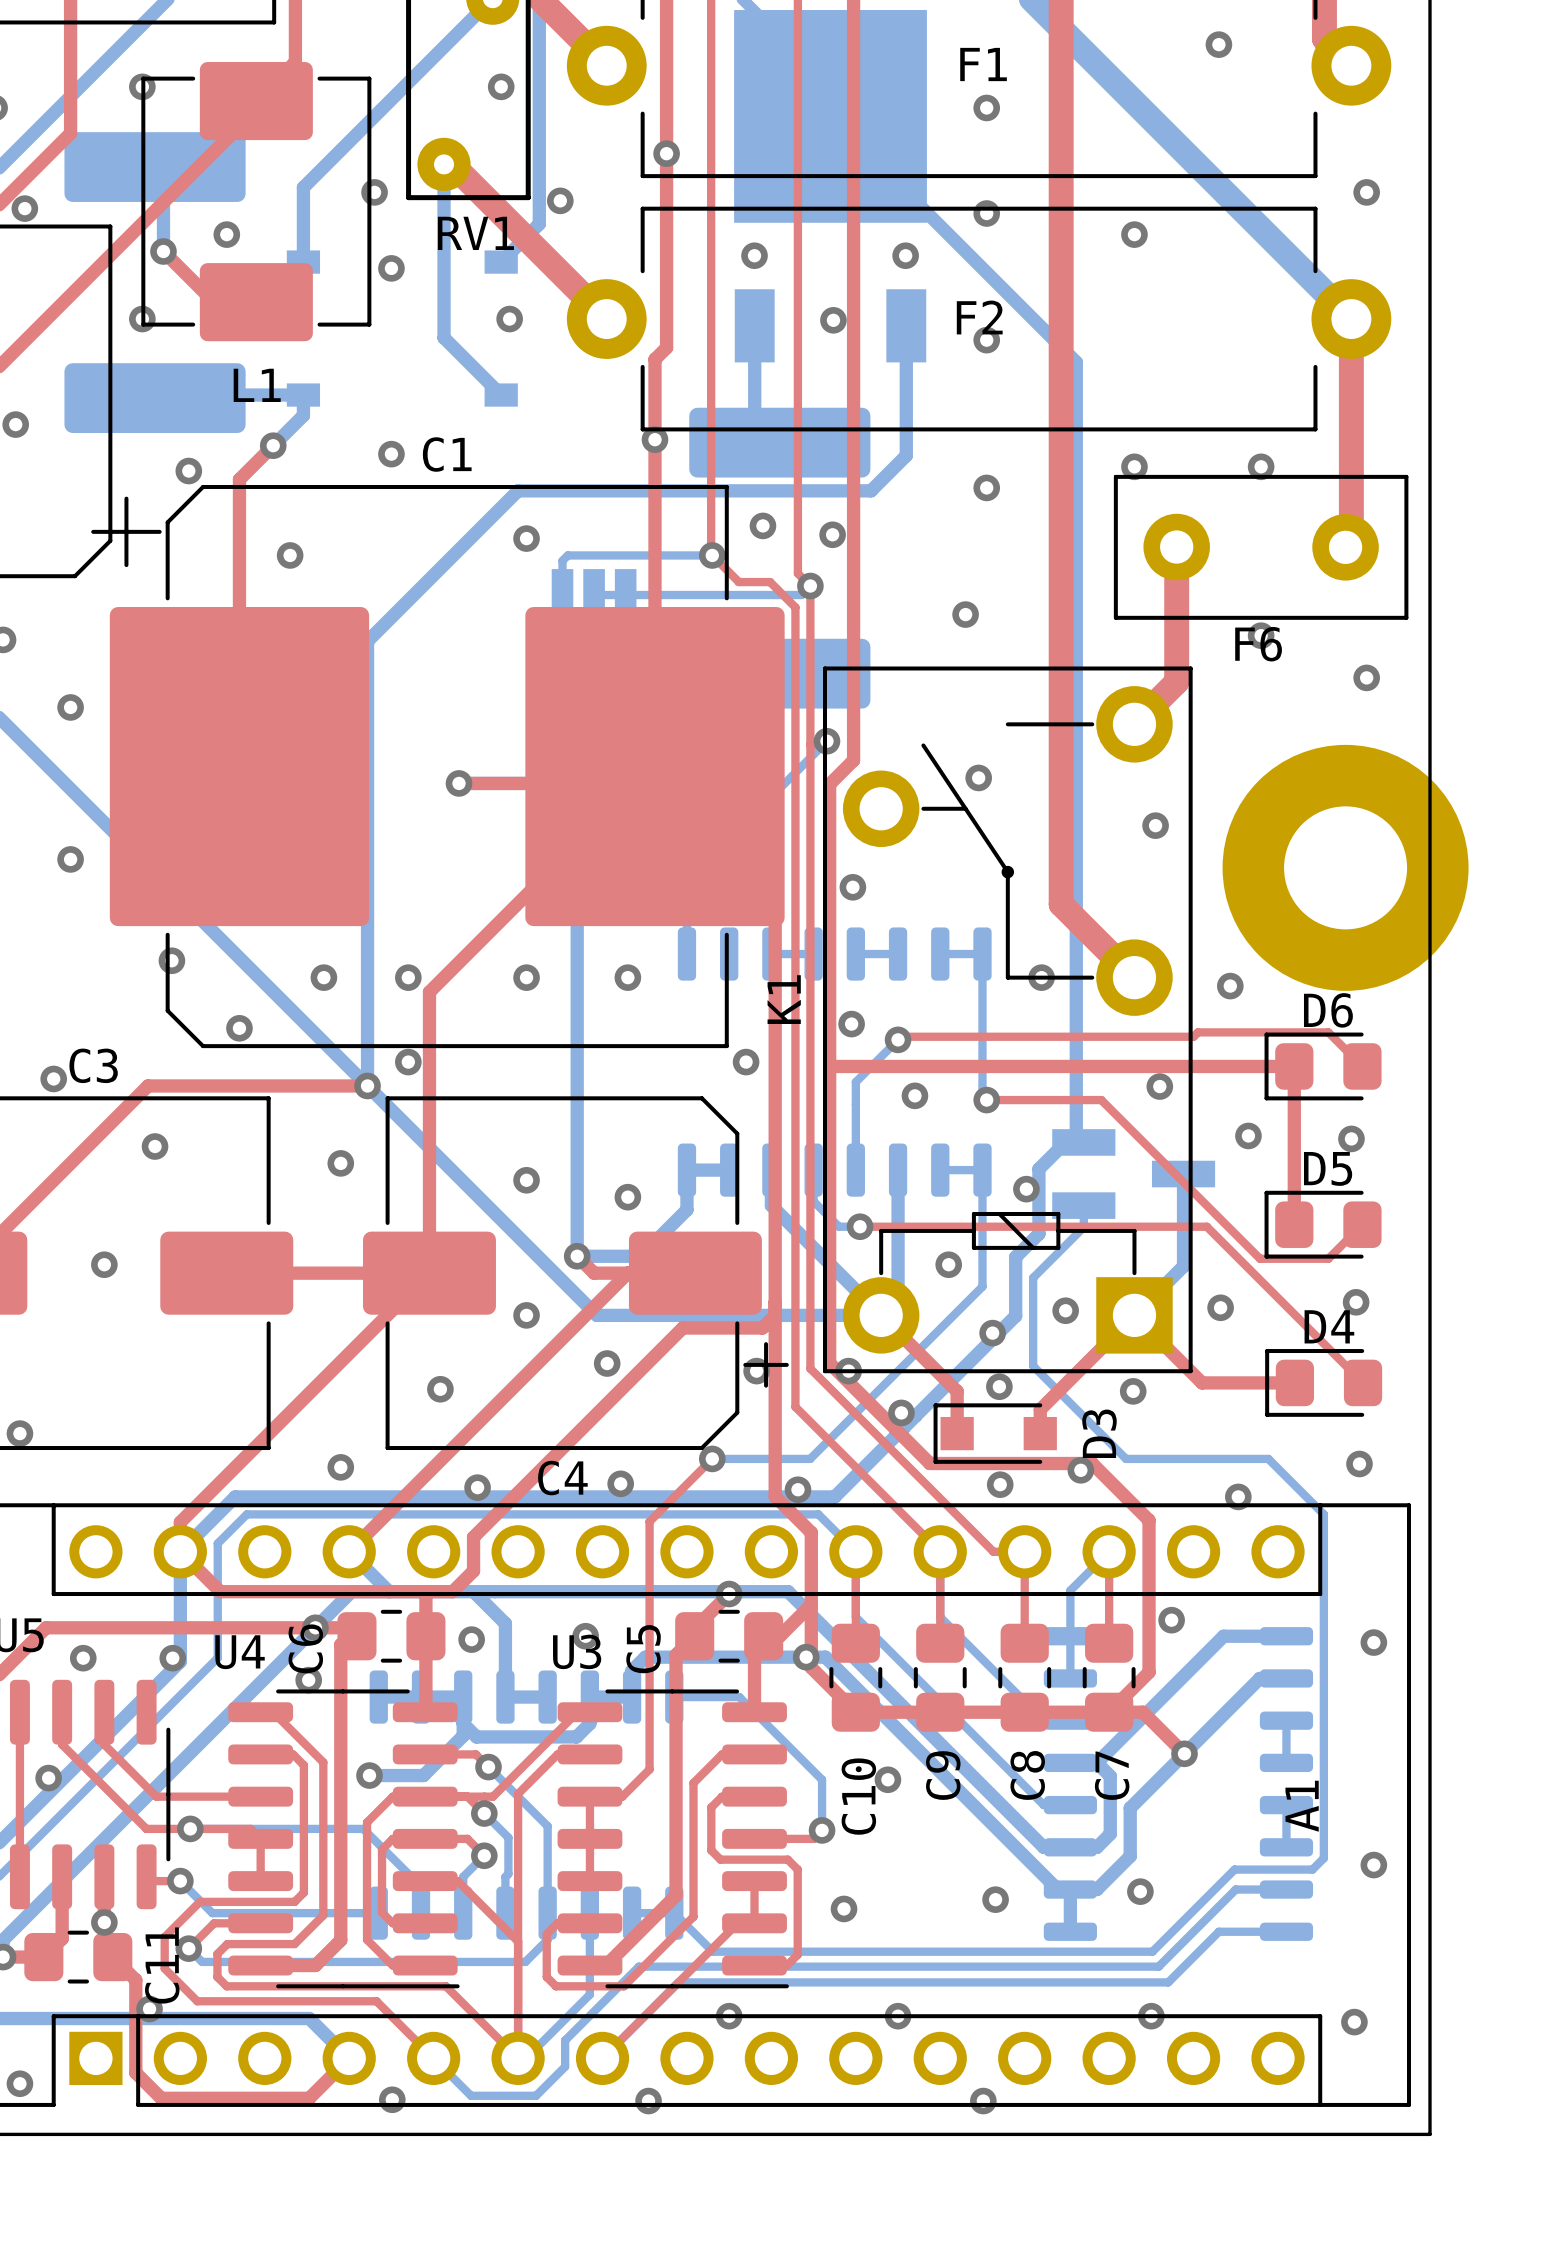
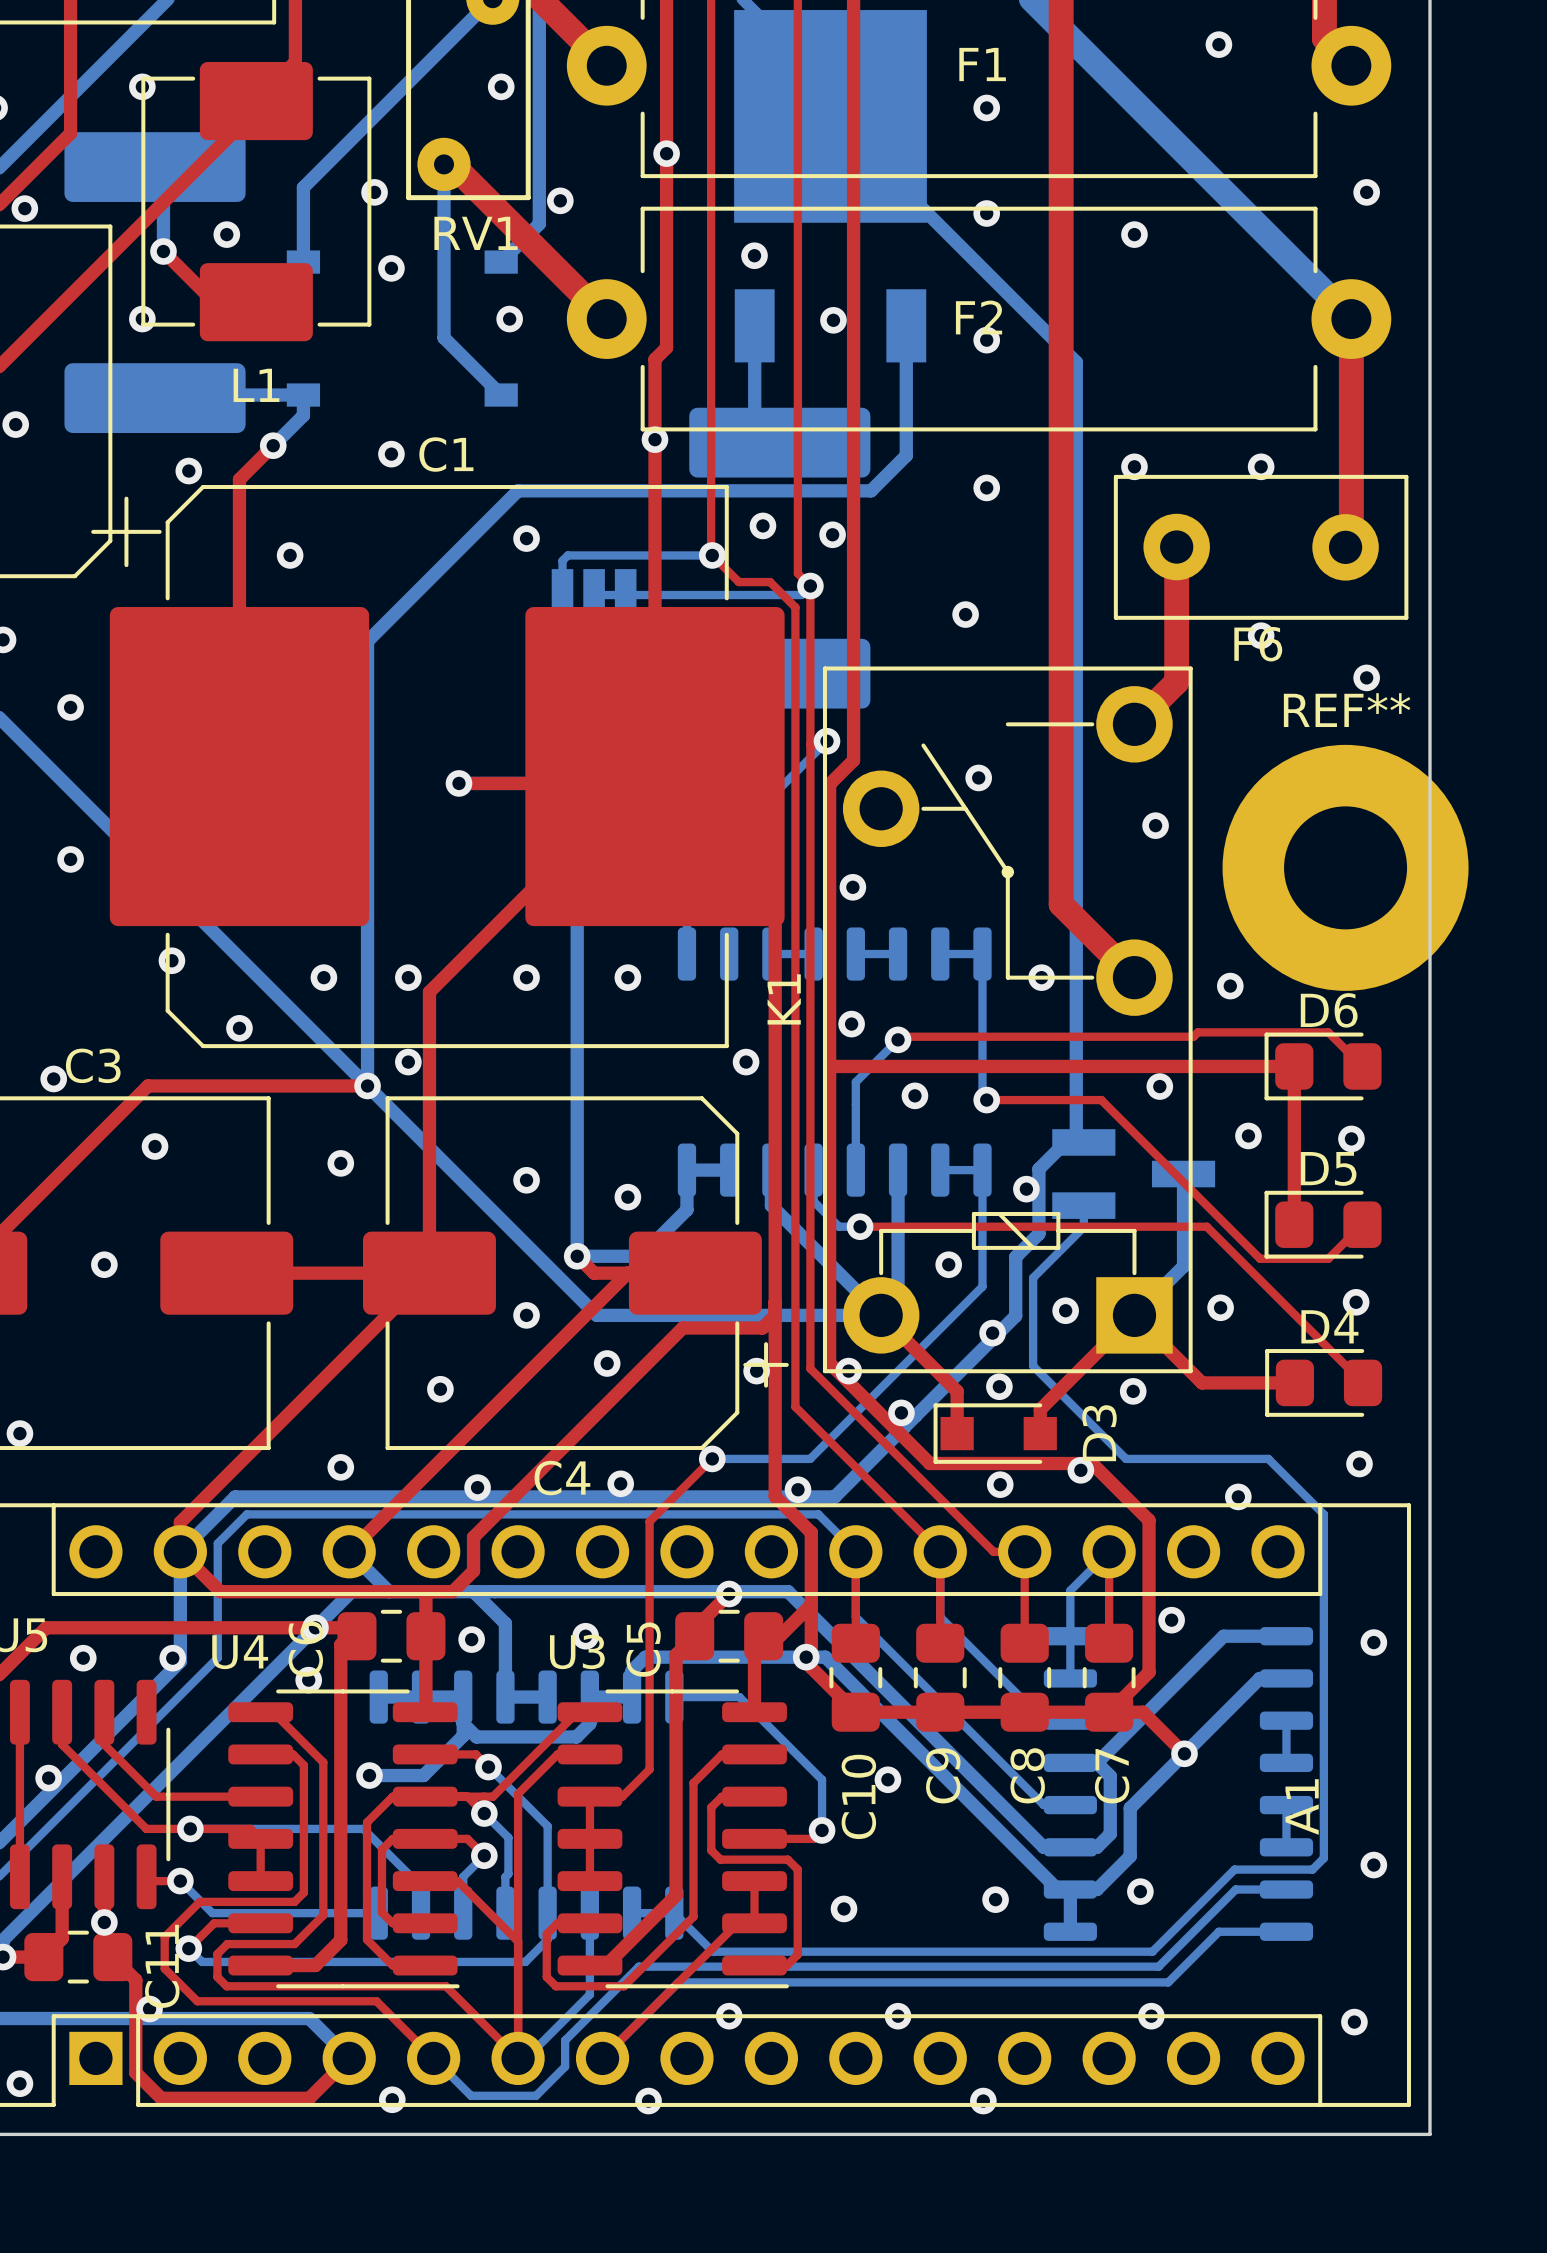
via: (905, 255) -> none
REF** name: none -> REF** (1347, 710)

